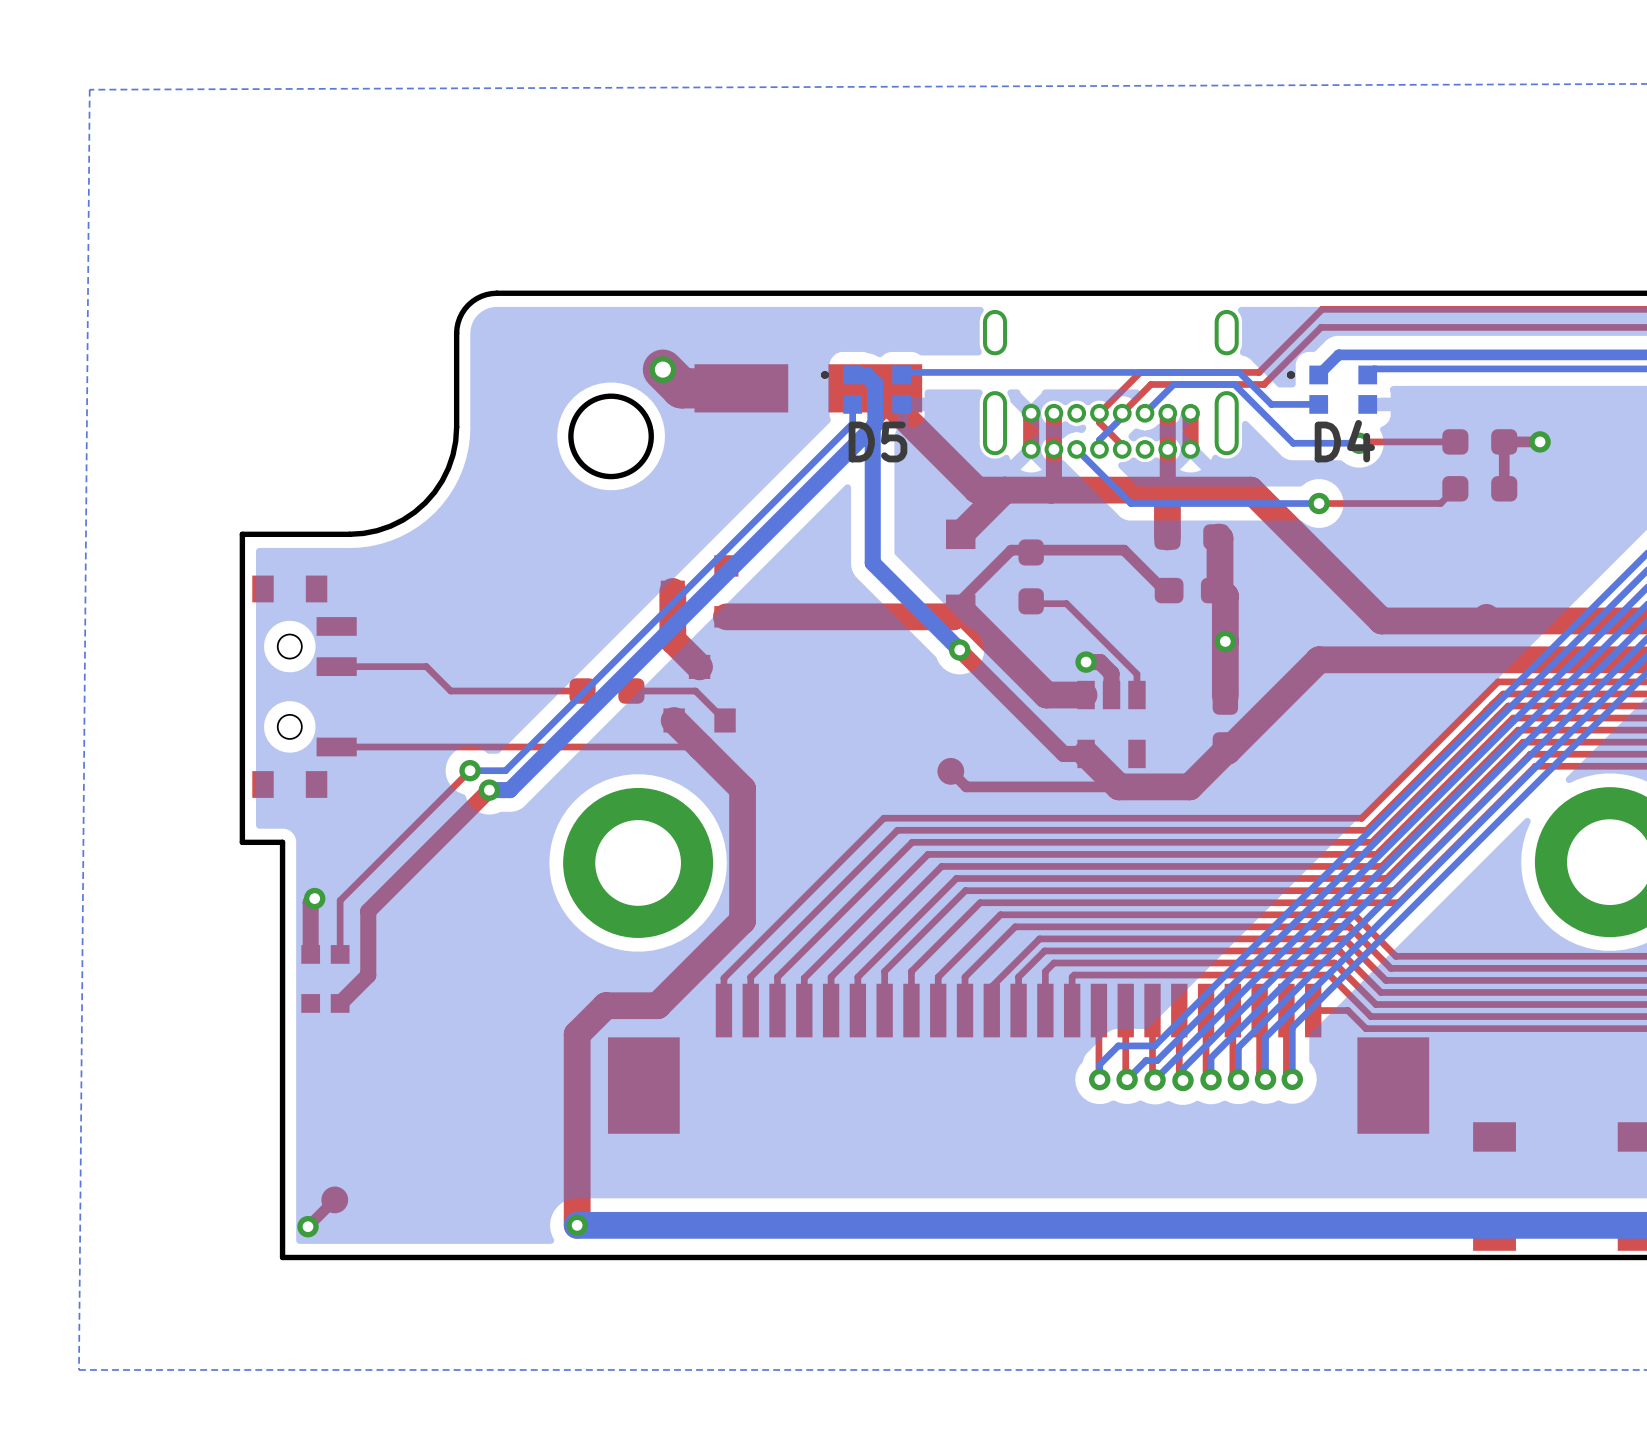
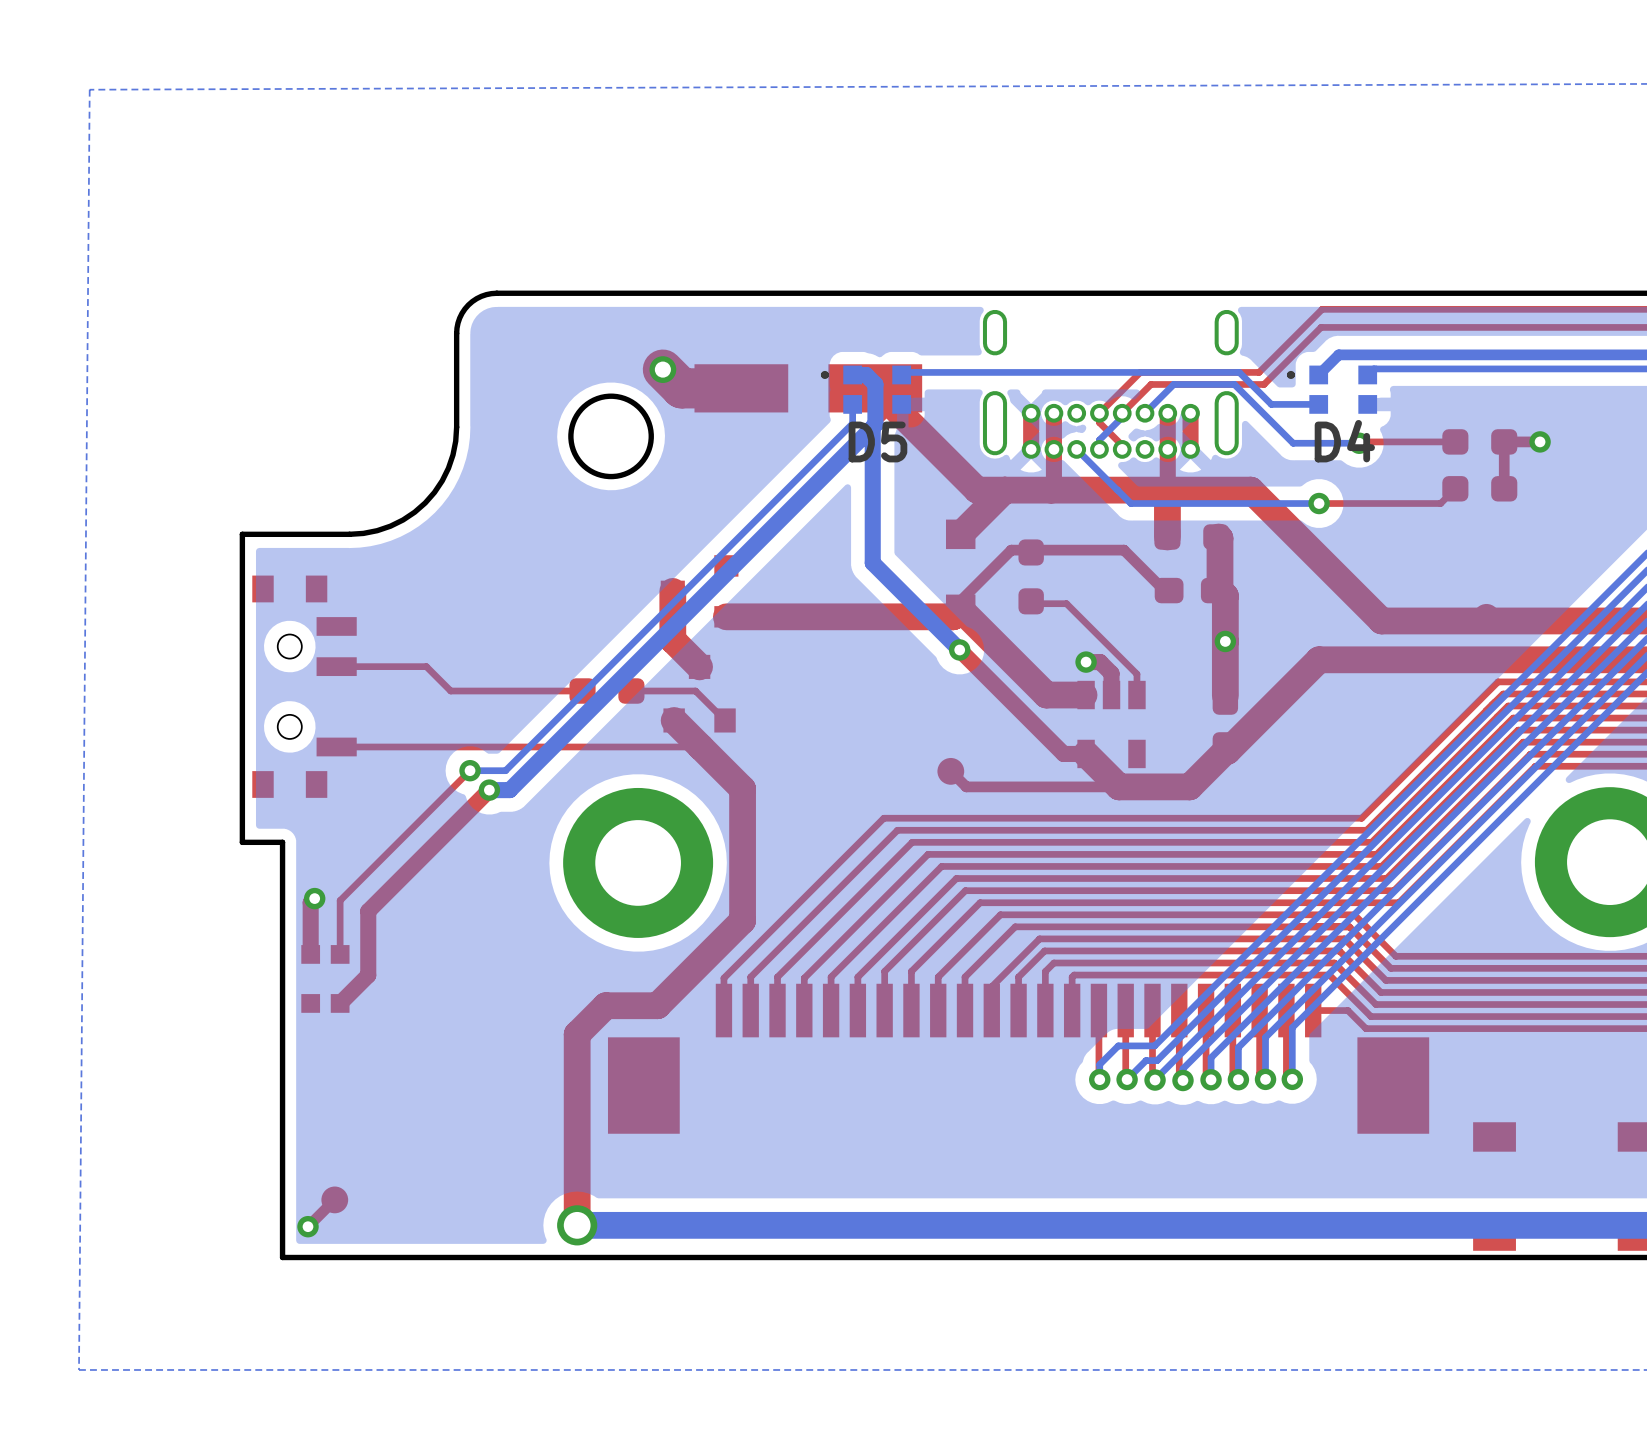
via size: [566, 1214, 588, 1237] -> [557, 1205, 598, 1246]

